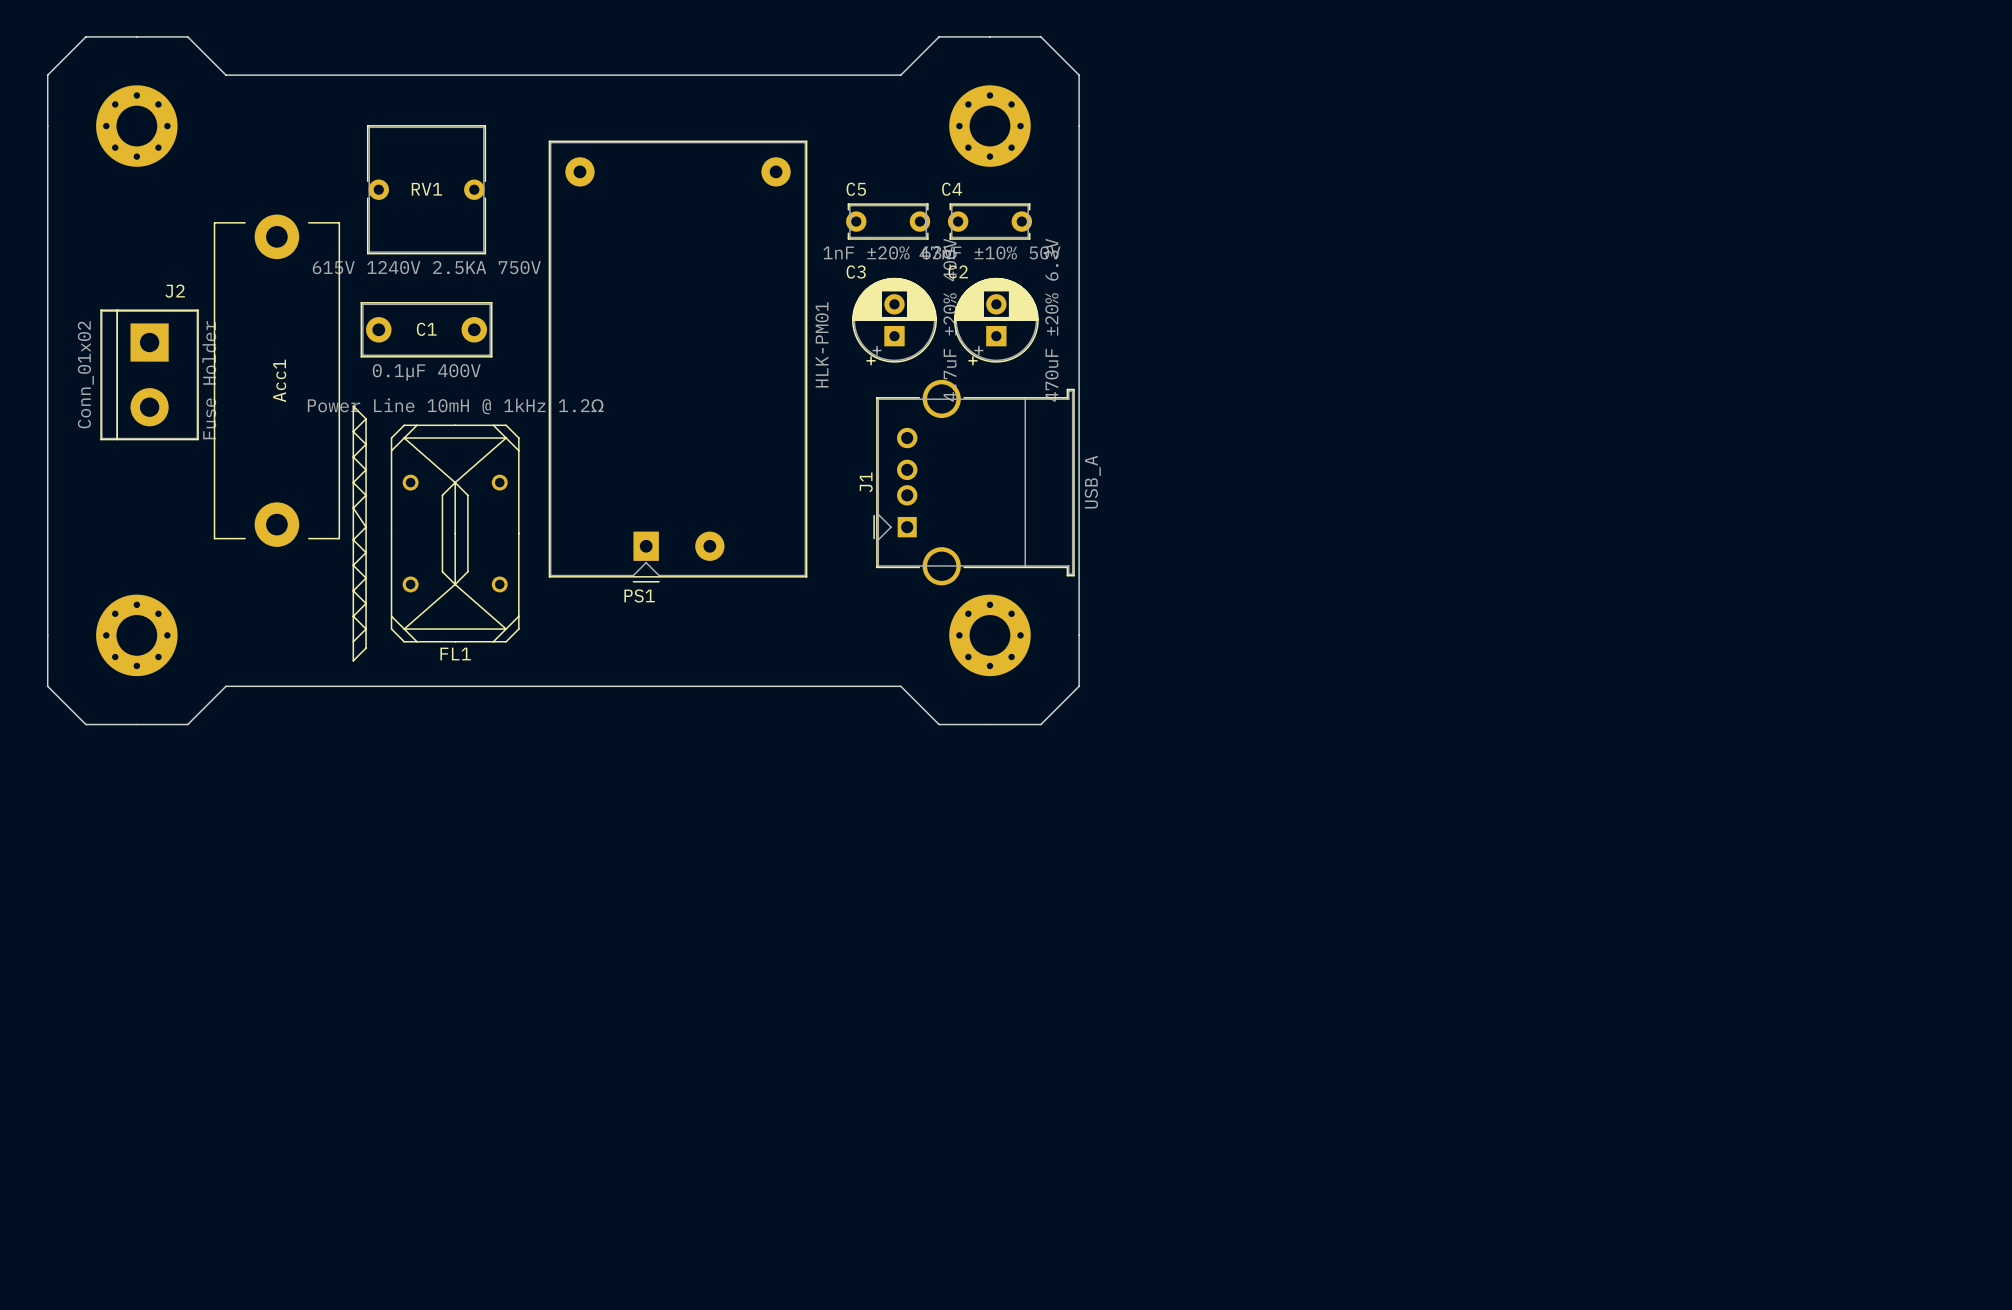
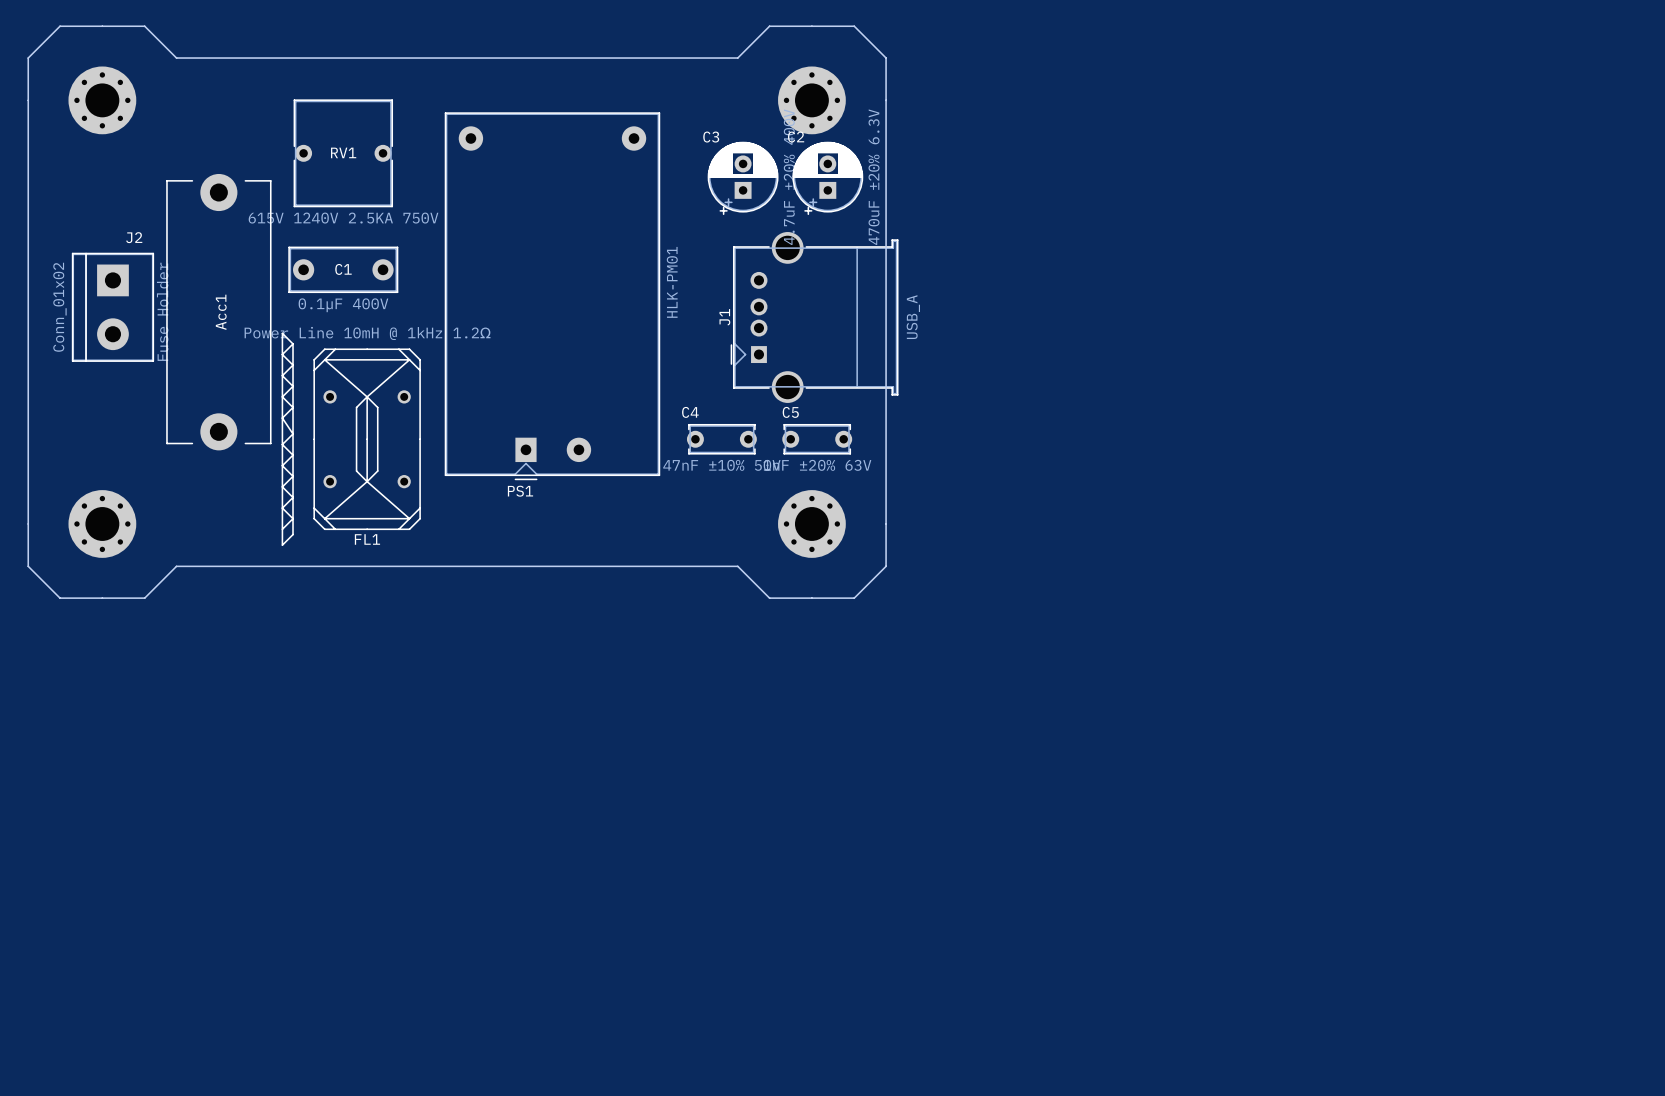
C5 position: (888, 221) -> (817, 439)
C4 position: (989, 221) -> (721, 439)
C3 position: (894, 321) -> (743, 178)
C2 position: (996, 321) -> (827, 178)
J1 position: (974, 482) -> (814, 317)

